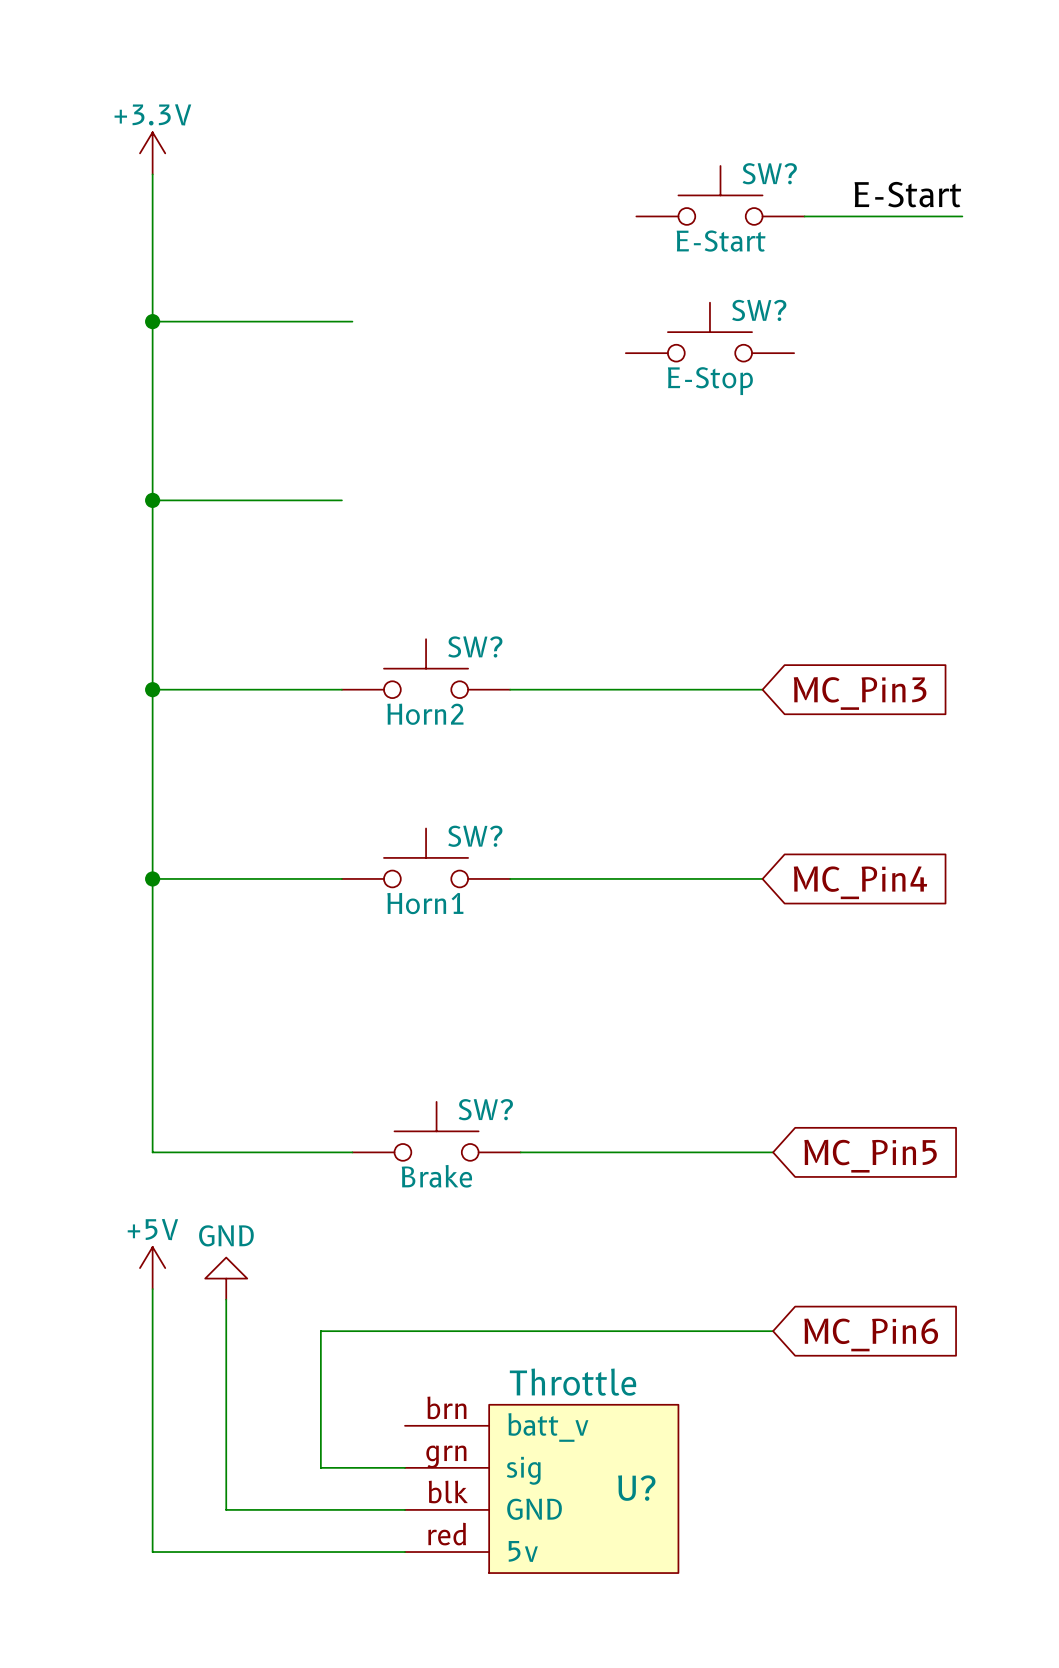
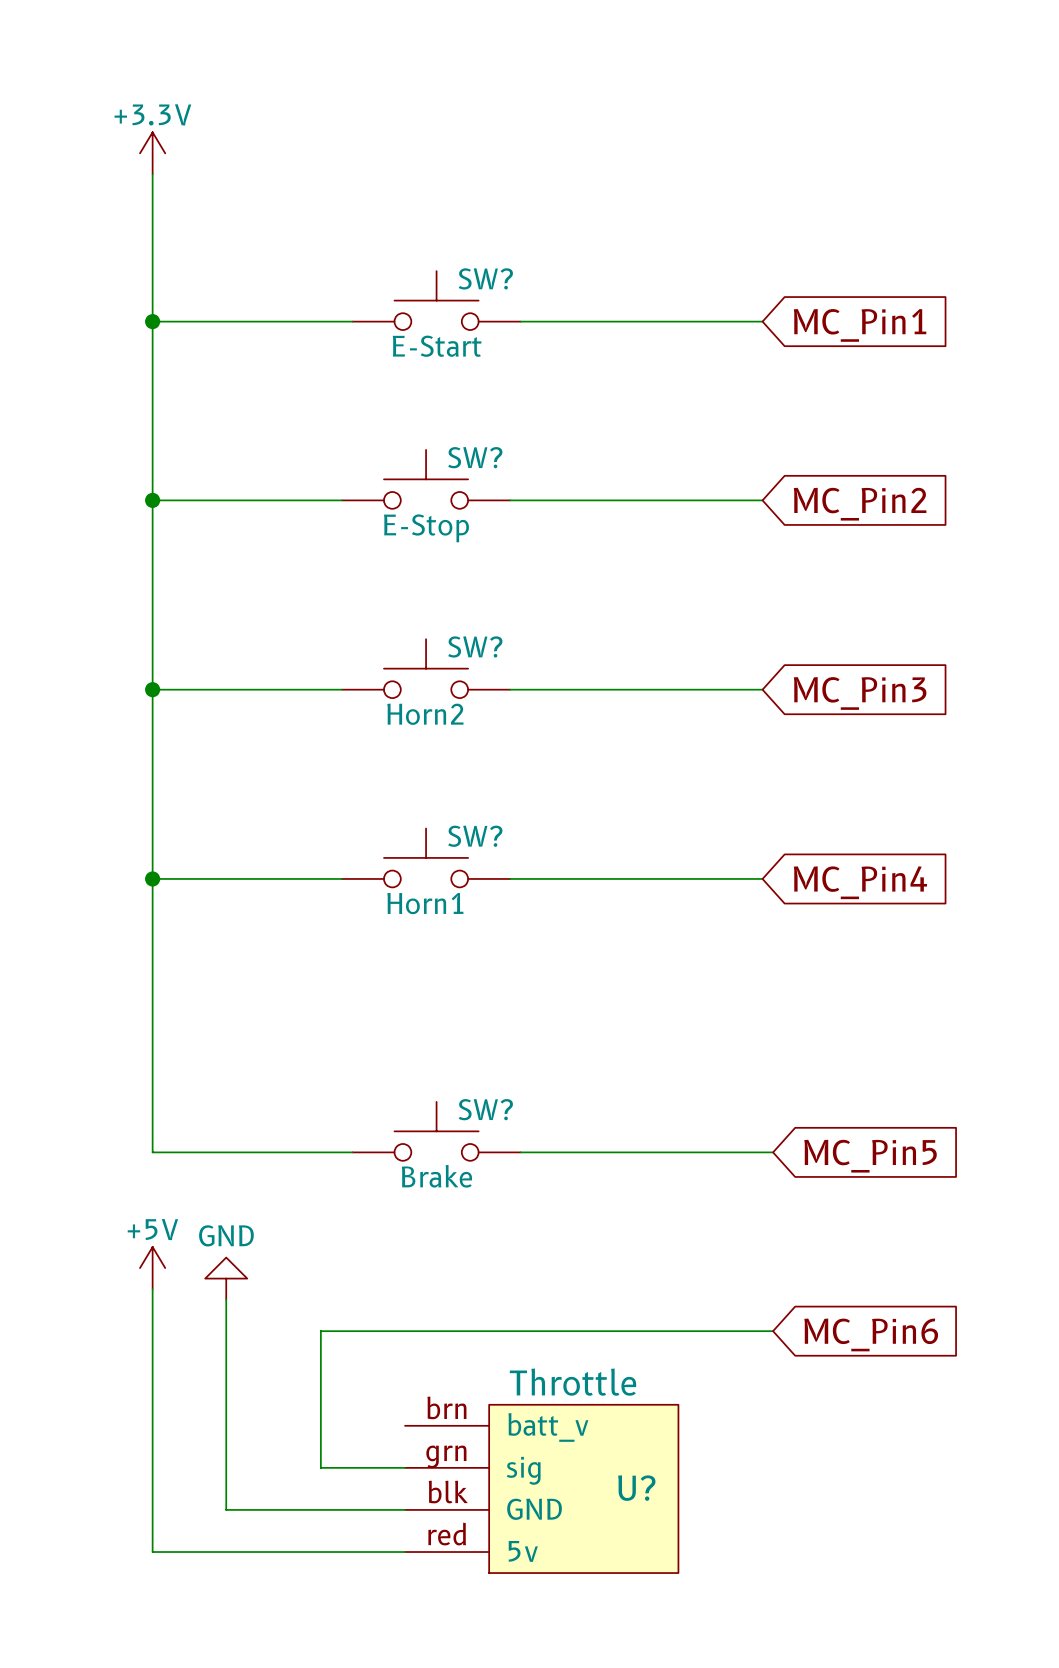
label: E-Start (907, 194) -> none
SW? position: (720, 195) -> (436, 300)
wire: (804, 216) (962, 216) -> none
wire: none -> (520, 321) (762, 321)
global label: none -> MC_Pin1 (860, 325)
SW? position: (709, 332) -> (426, 479)
wire: none -> (510, 500) (762, 500)
global label: none -> MC_Pin2 (860, 504)

